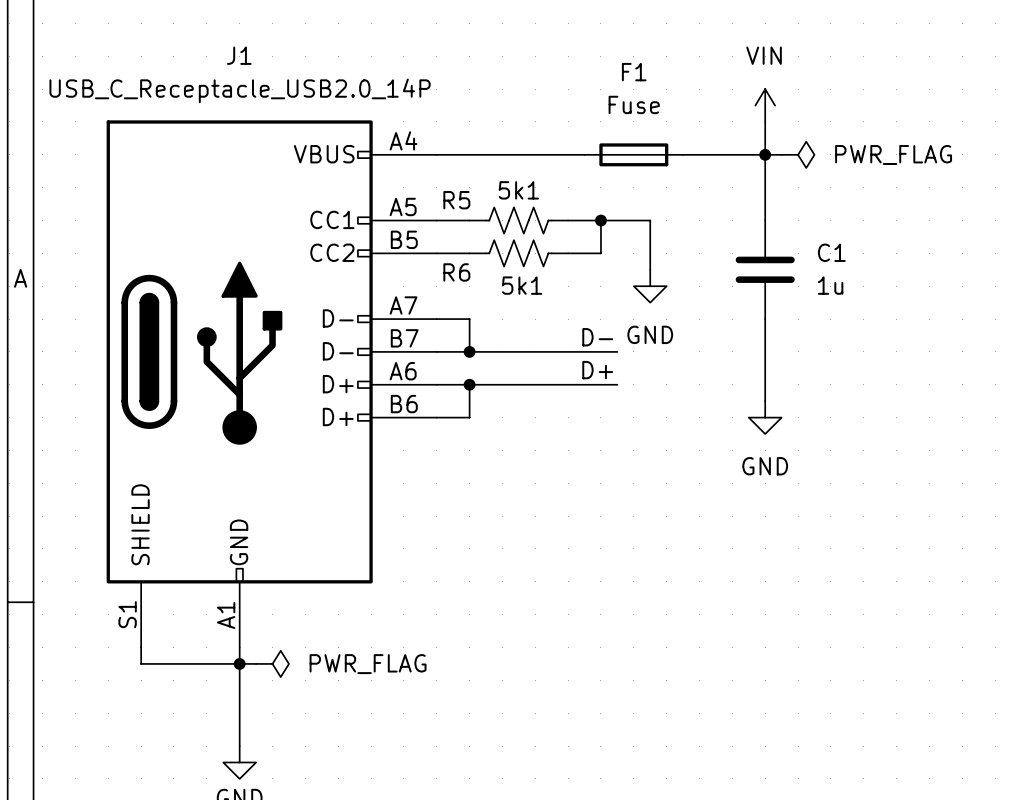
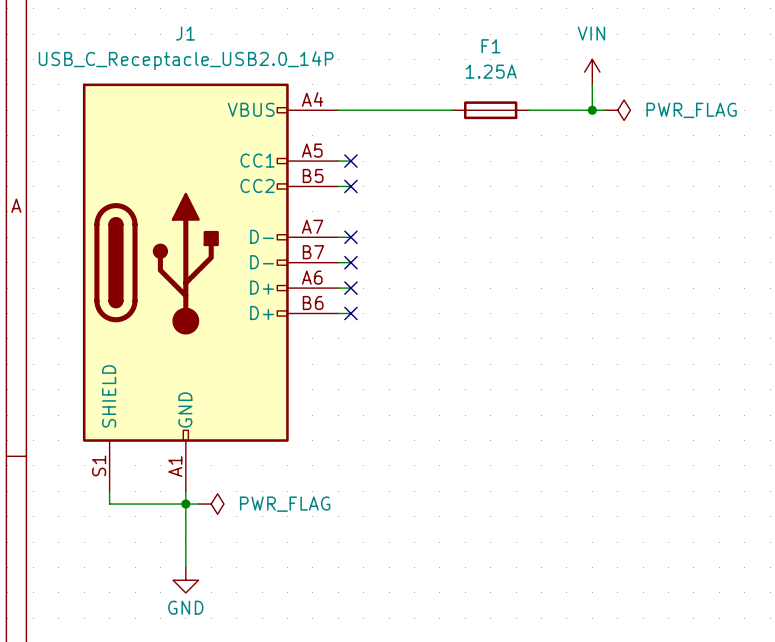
F1 value: Fuse (634, 104) -> 1.25A (491, 71)
wire: (765, 154) (765, 220) -> none
wire: (453, 220) (469, 220) -> none
no-connect mark: none -> (350, 161)
R5: 5k1 (518, 220) -> none
wire: (568, 220) (650, 220) (650, 269) -> none
wire: (600, 220) (600, 253) (568, 253) -> none
junction: (600, 220) -> none
wire: (453, 253) (469, 253) -> none
no-connect mark: none -> (350, 186)
R6: 5k1 (518, 253) -> none
C1: 1u (765, 269) -> none
power symbol: GND (650, 286) -> none
wire: (453, 319) (469, 319) (469, 351) -> none
no-connect mark: none -> (350, 237)
wire: (765, 319) (765, 401) -> none
label: D- (597, 337) -> none
wire: (453, 351) (617, 351) -> none
no-connect mark: none -> (350, 262)
junction: (469, 351) -> none
label: D+ (597, 370) -> none
wire: (453, 384) (617, 384) -> none
no-connect mark: none -> (350, 288)
wire: (469, 384) (469, 417) (453, 417) -> none
junction: (469, 384) -> none
no-connect mark: none -> (350, 313)
power symbol: GND (765, 417) -> none

